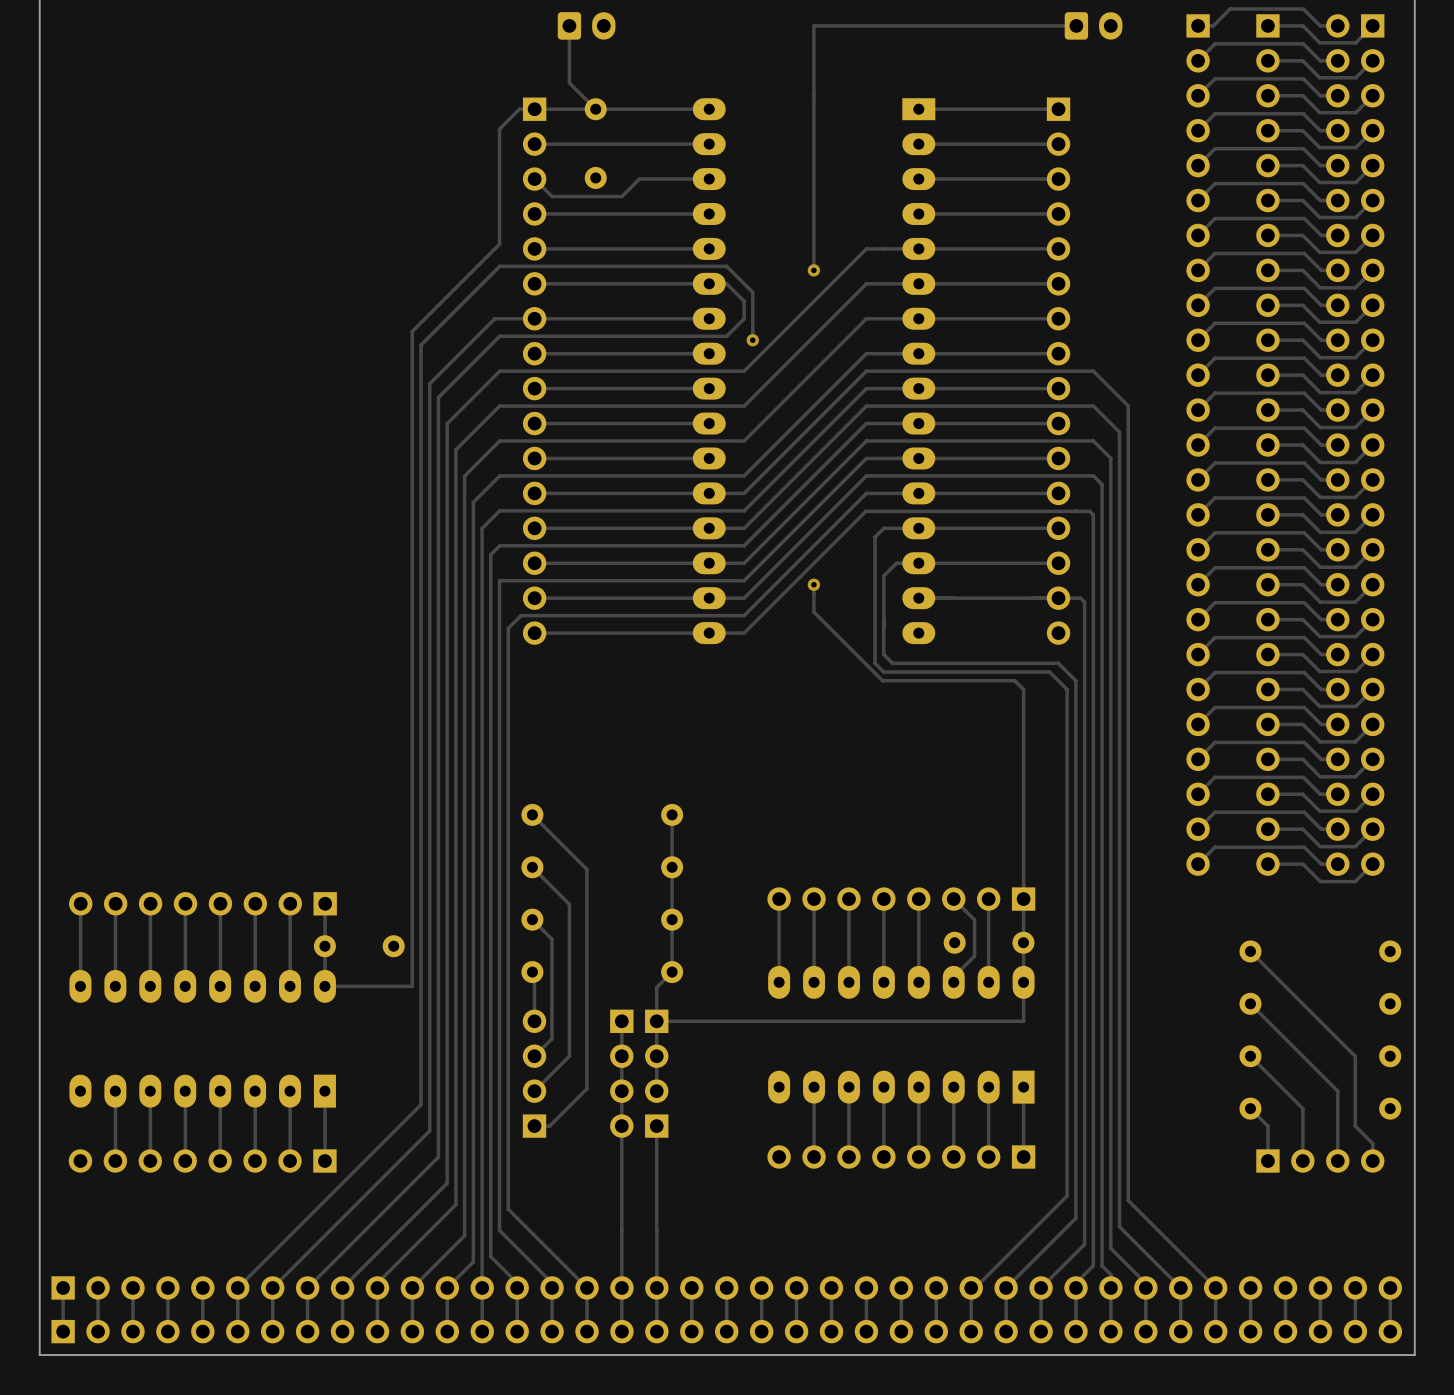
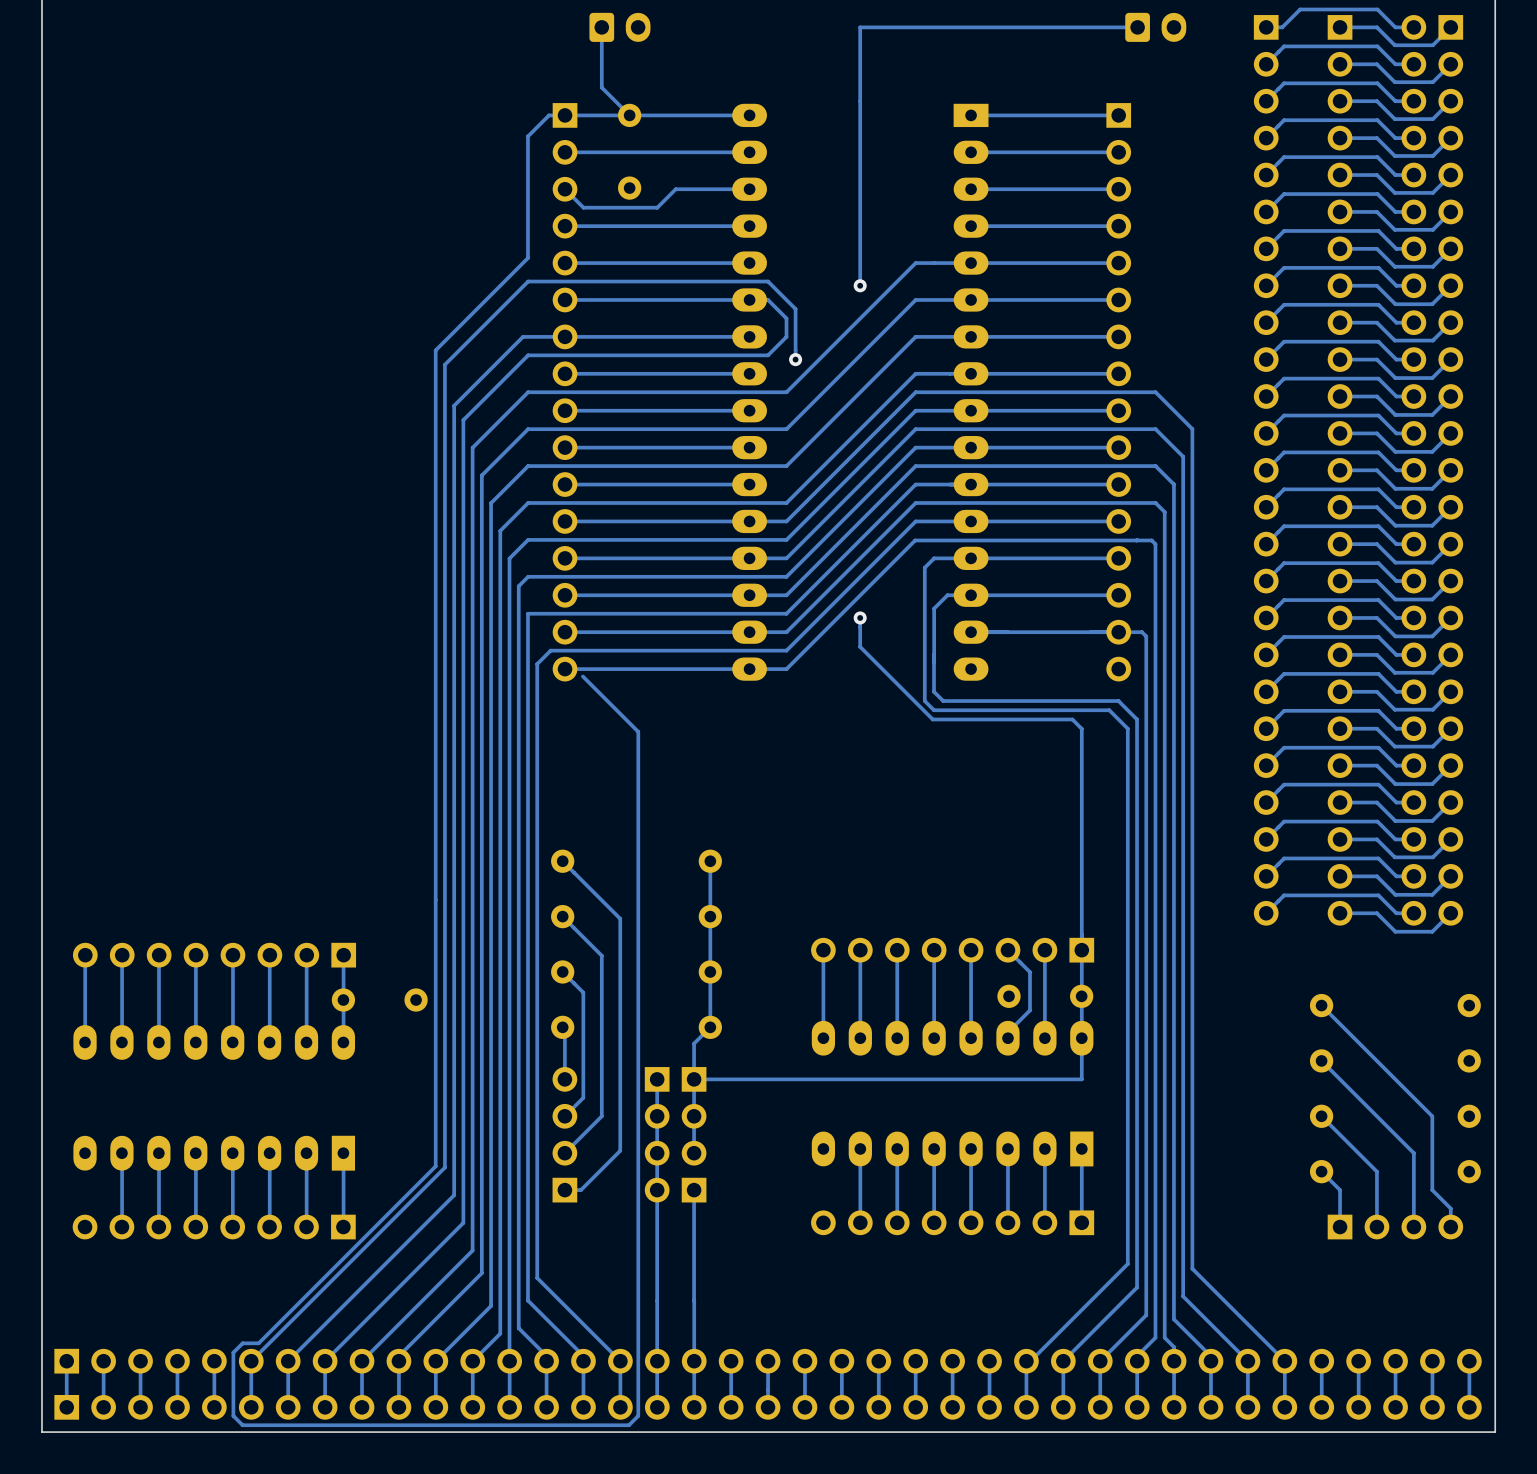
track: (412, 986) (324, 986) -> (435, 1042) (435, 1166) (258, 1343) (242, 1343) (233, 1352) (233, 1415) (242, 1425) (628, 1425) (638, 1415) (638, 731) (582, 676)

